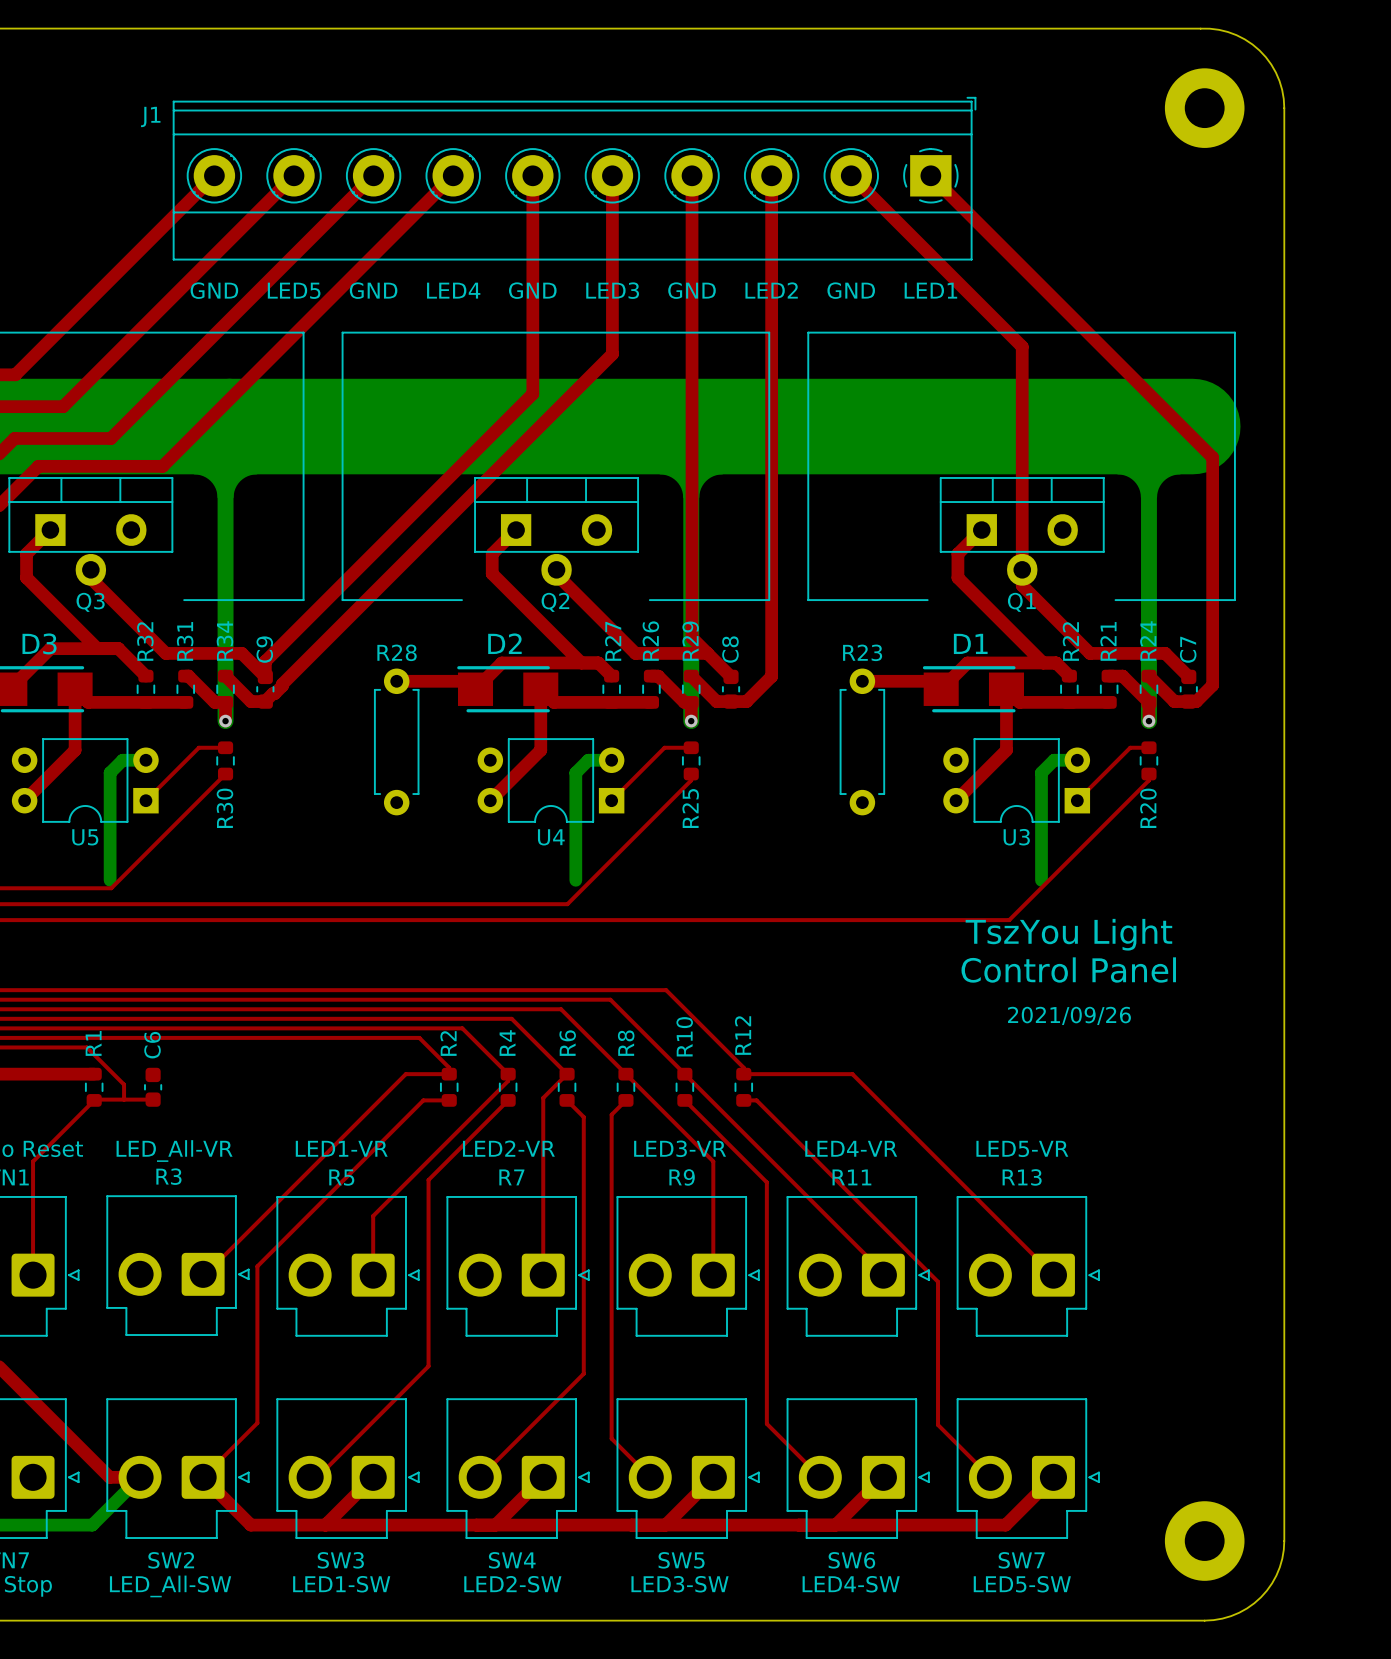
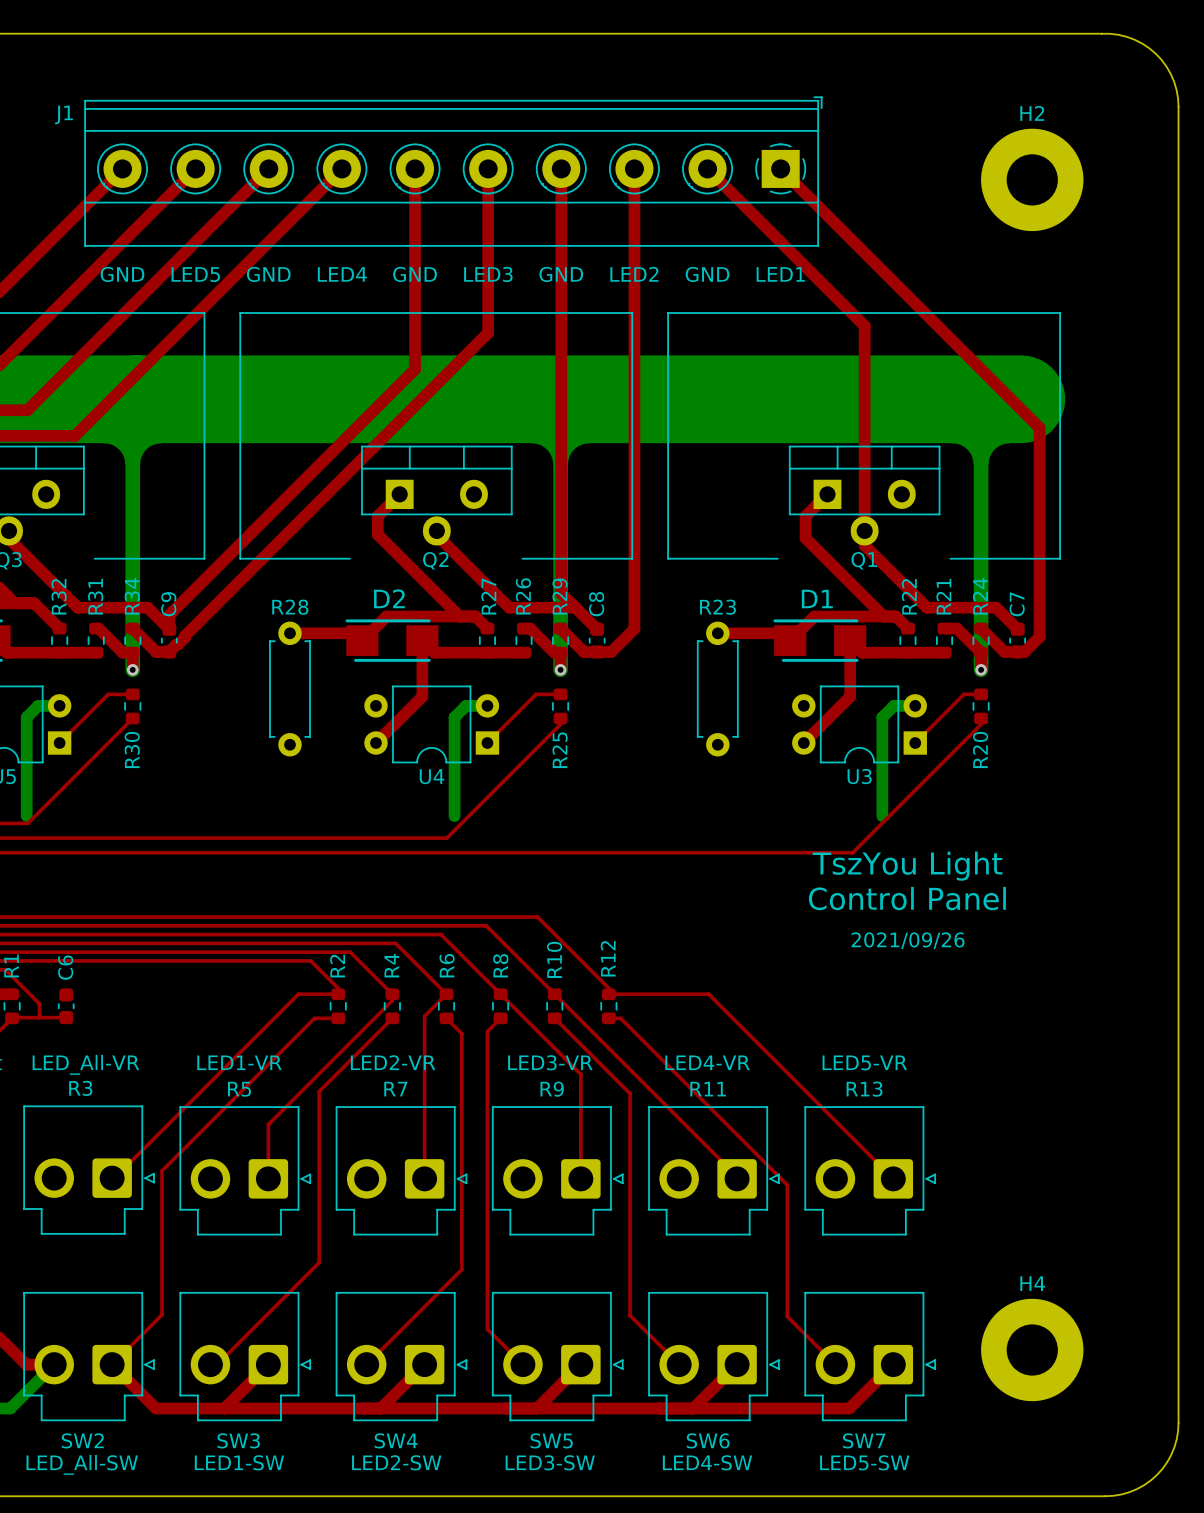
board edge: (1200, 28) (1227, 32) (1244, 39) (1259, 50) (1271, 64) (1279, 81) (1284, 108) (1284, 1541) (1279, 1567) (1272, 1583) (1260, 1597) (1247, 1608) (1230, 1616) (1204, 1620) -> (1028, 33) (1110, 33) (1134, 39) (1149, 48) (1166, 66) (1176, 89) (1178, 106) (1178, 1431) (1174, 1447) (1162, 1468) (1151, 1480) (1137, 1489) (1113, 1495) (1032, 1496)
part: (1204, 108) -> none
H2: none -> (1032, 179)
H4: none -> (1032, 1350)
part: (1204, 1541) -> none

